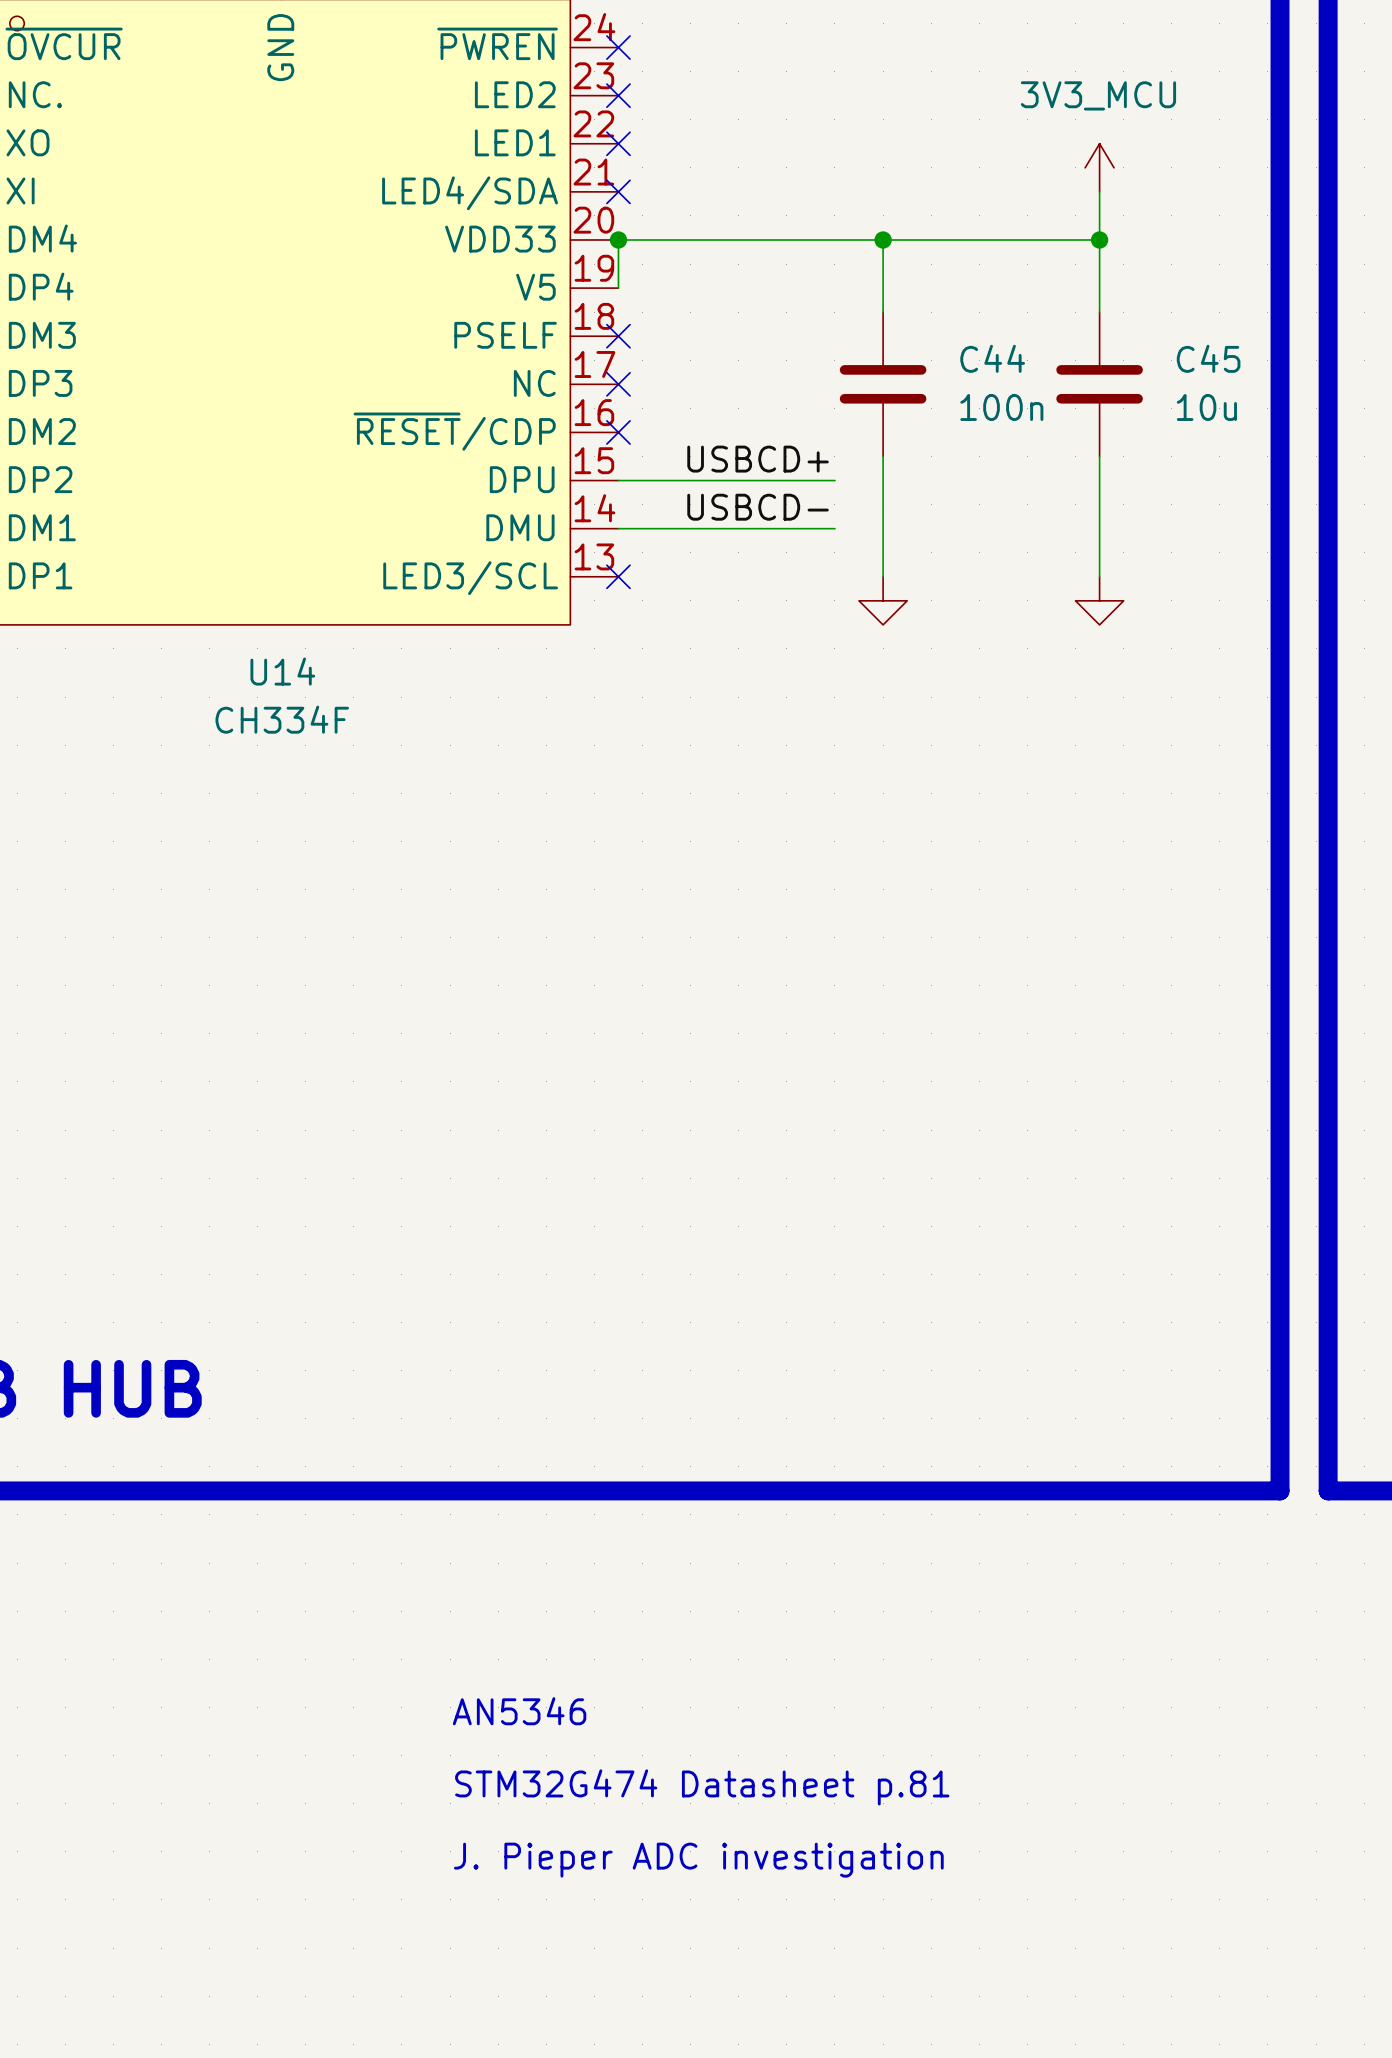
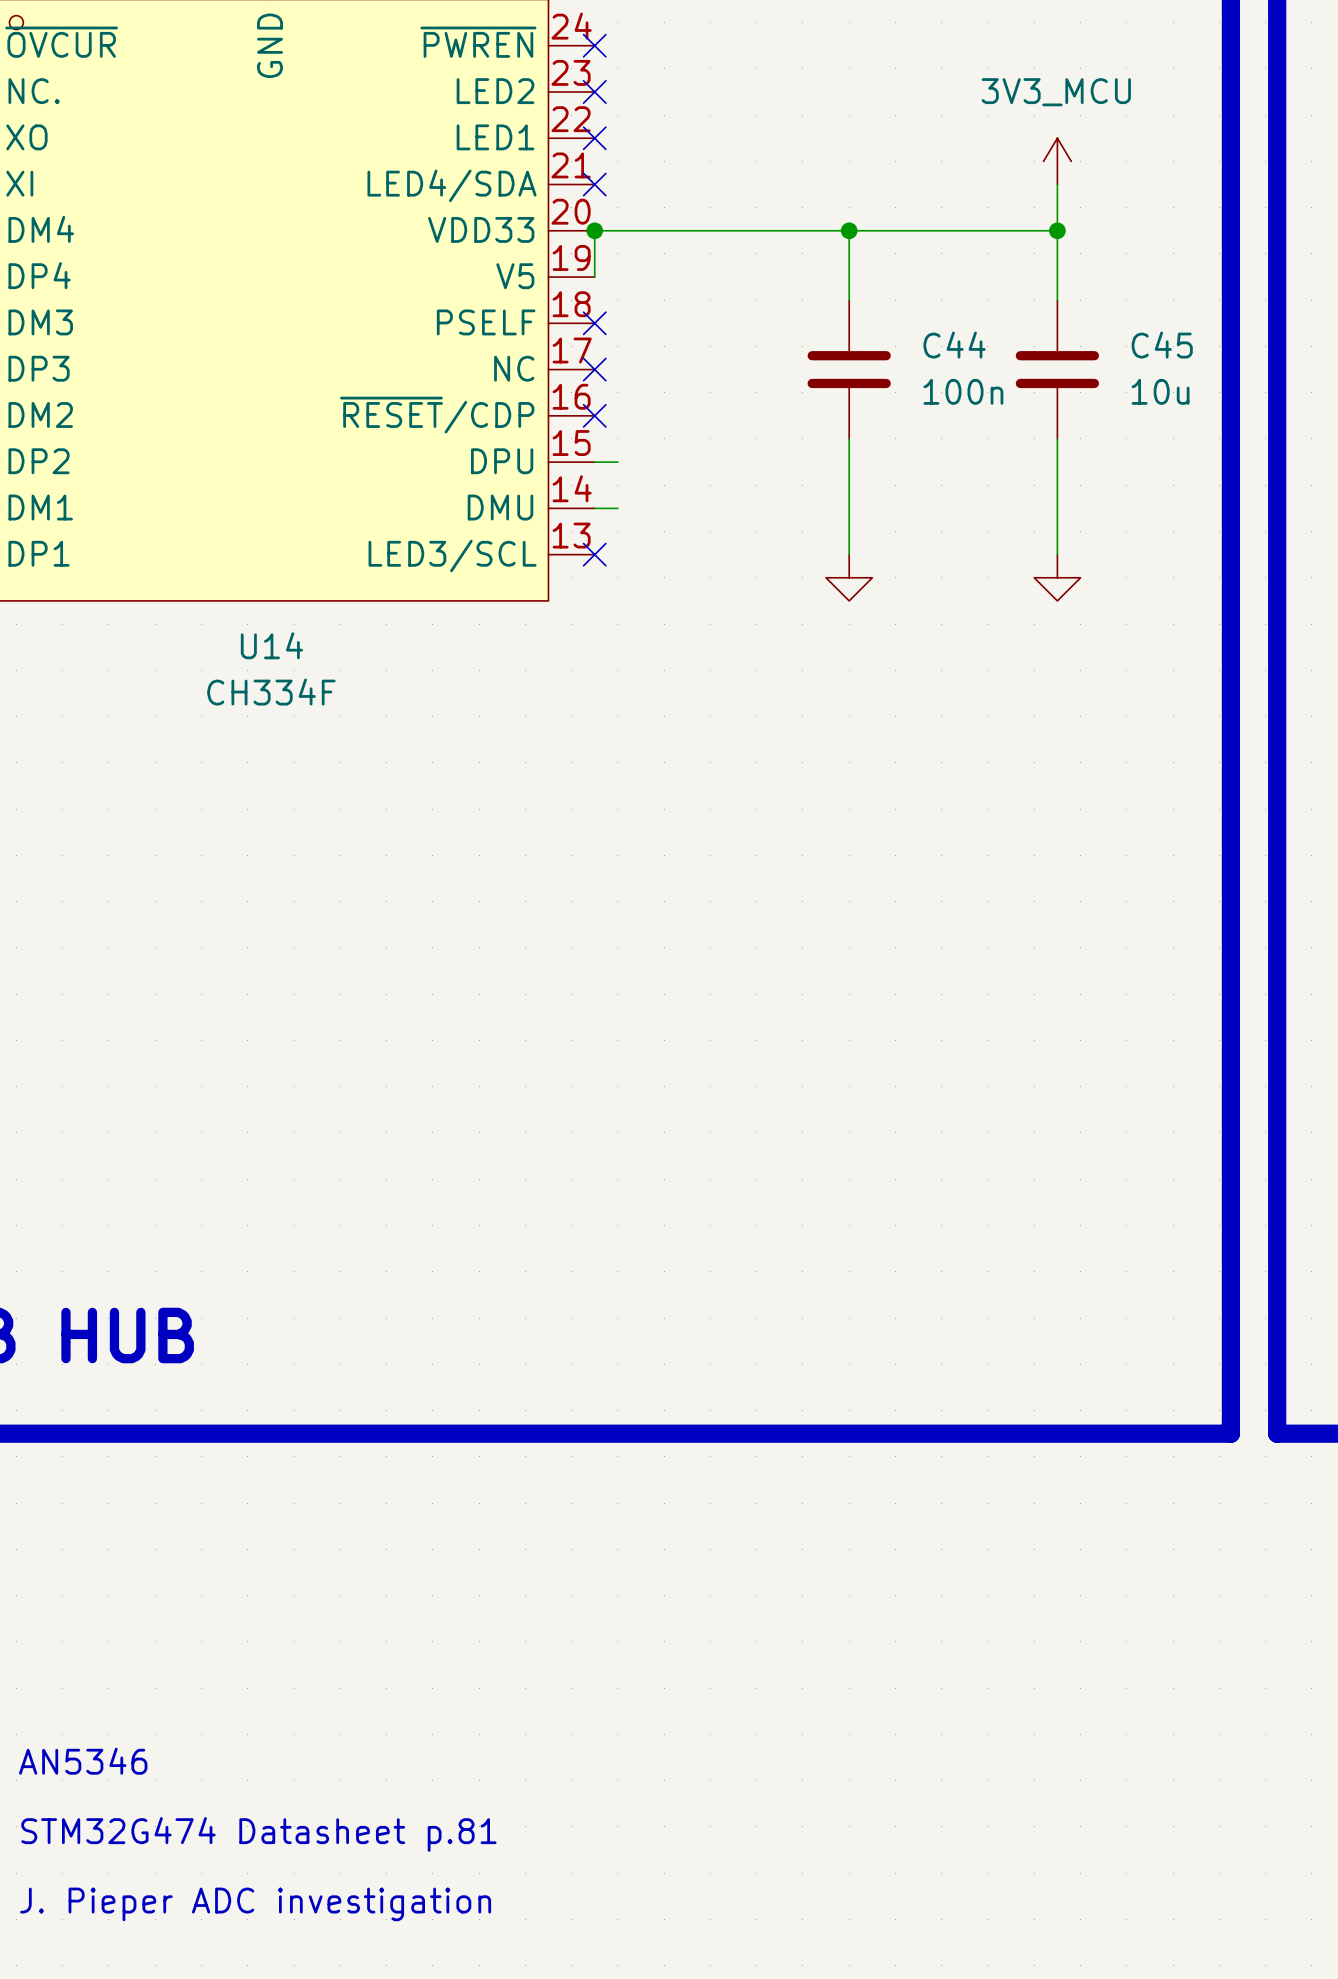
label: USBCD+ (758, 459) -> none
wire: (642, 480) (834, 480) -> none
label: USBCD- (758, 507) -> none
wire: (642, 528) (834, 528) -> none
text position: AN5346 (519, 1711) -> AN5346 (83, 1761)
text position: STM32G474 Datasheet p.81 (702, 1787) -> STM32G474 Datasheet p.81 (258, 1834)
text position: J. Pieper ADC investigation (698, 1860) -> J. Pieper ADC investigation (255, 1904)

